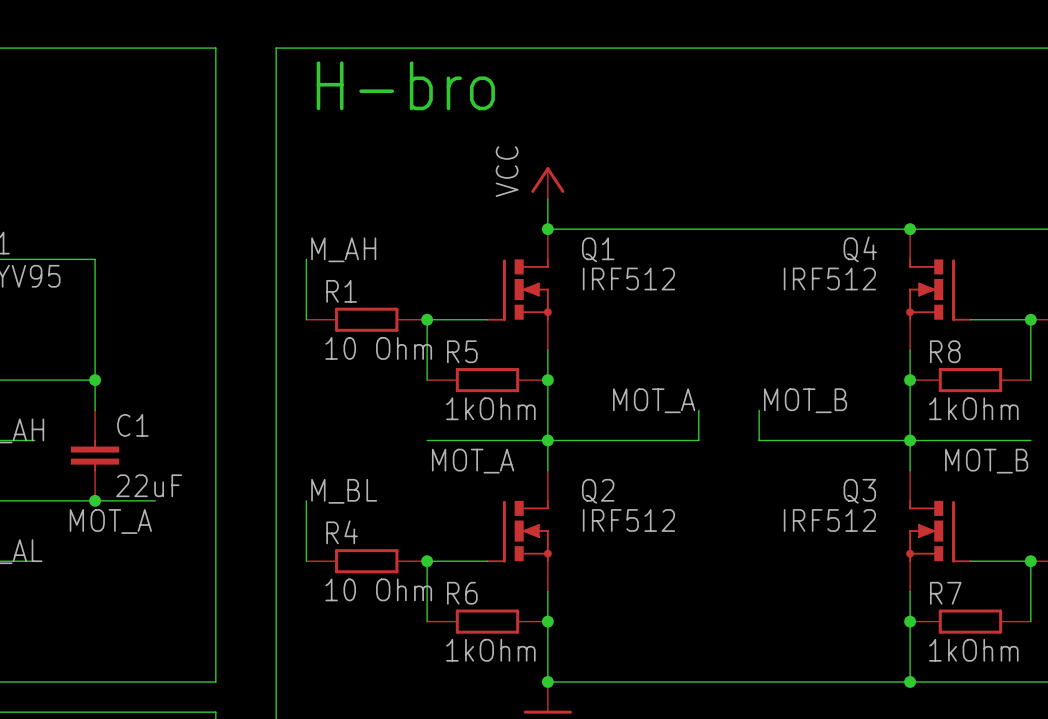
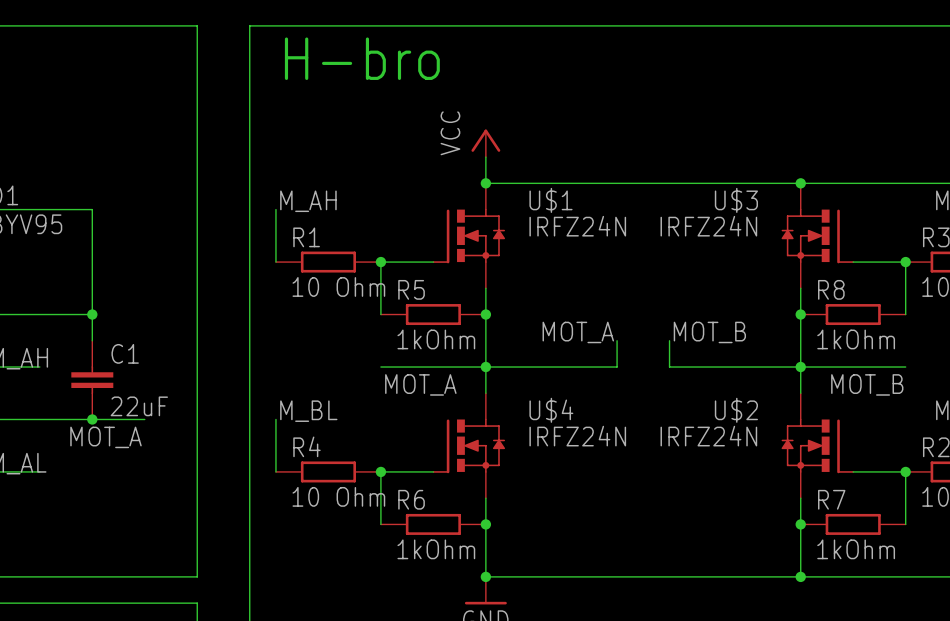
Q1: IRF512 (519, 289) -> none
U$1: none -> IRFZ24N (468, 235)
U$3: none -> IRFZ24N (817, 235)
Q4: IRF512 (938, 289) -> none
Q2: IRF512 (519, 531) -> none
U$4: none -> IRFZ24N (468, 445)
U$2: none -> IRFZ24N (817, 445)
Q3: IRF512 (938, 531) -> none

